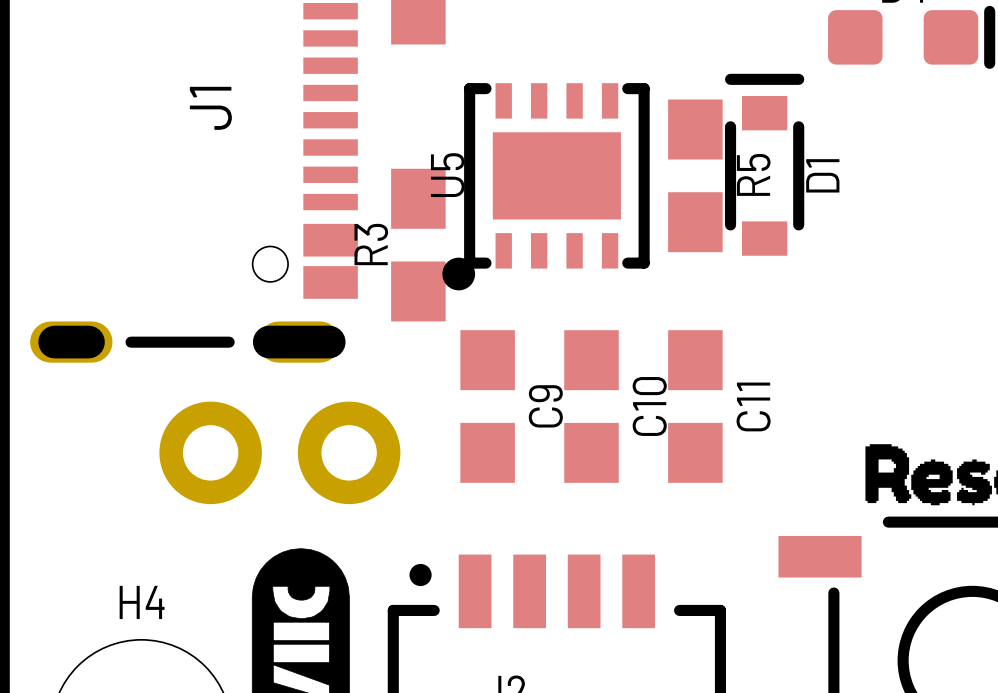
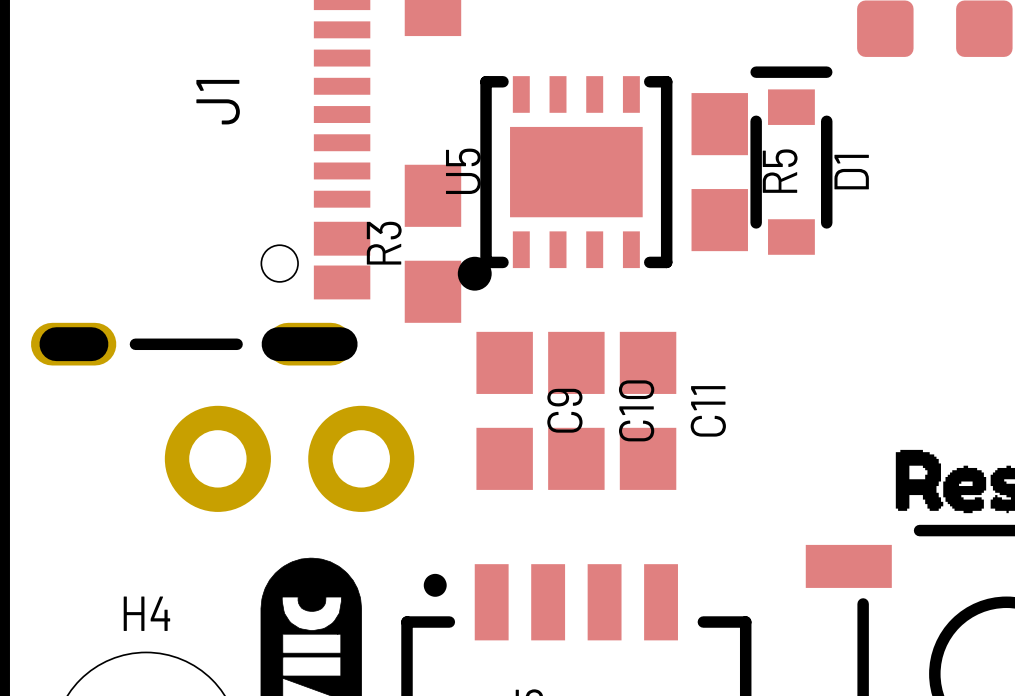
C10 position: (591, 406) -> (576, 410)
C11 position: (695, 406) -> (648, 410)

